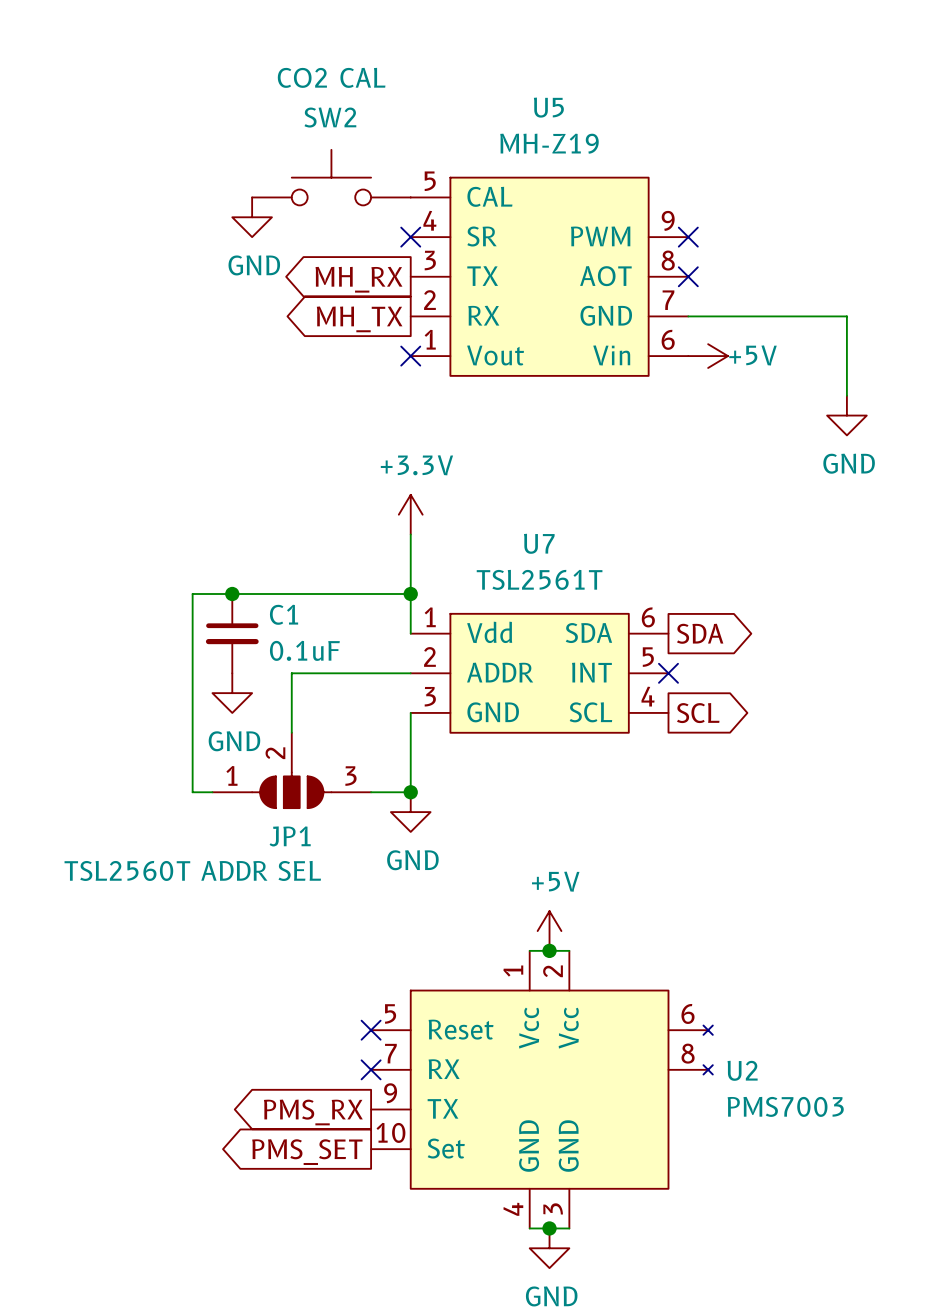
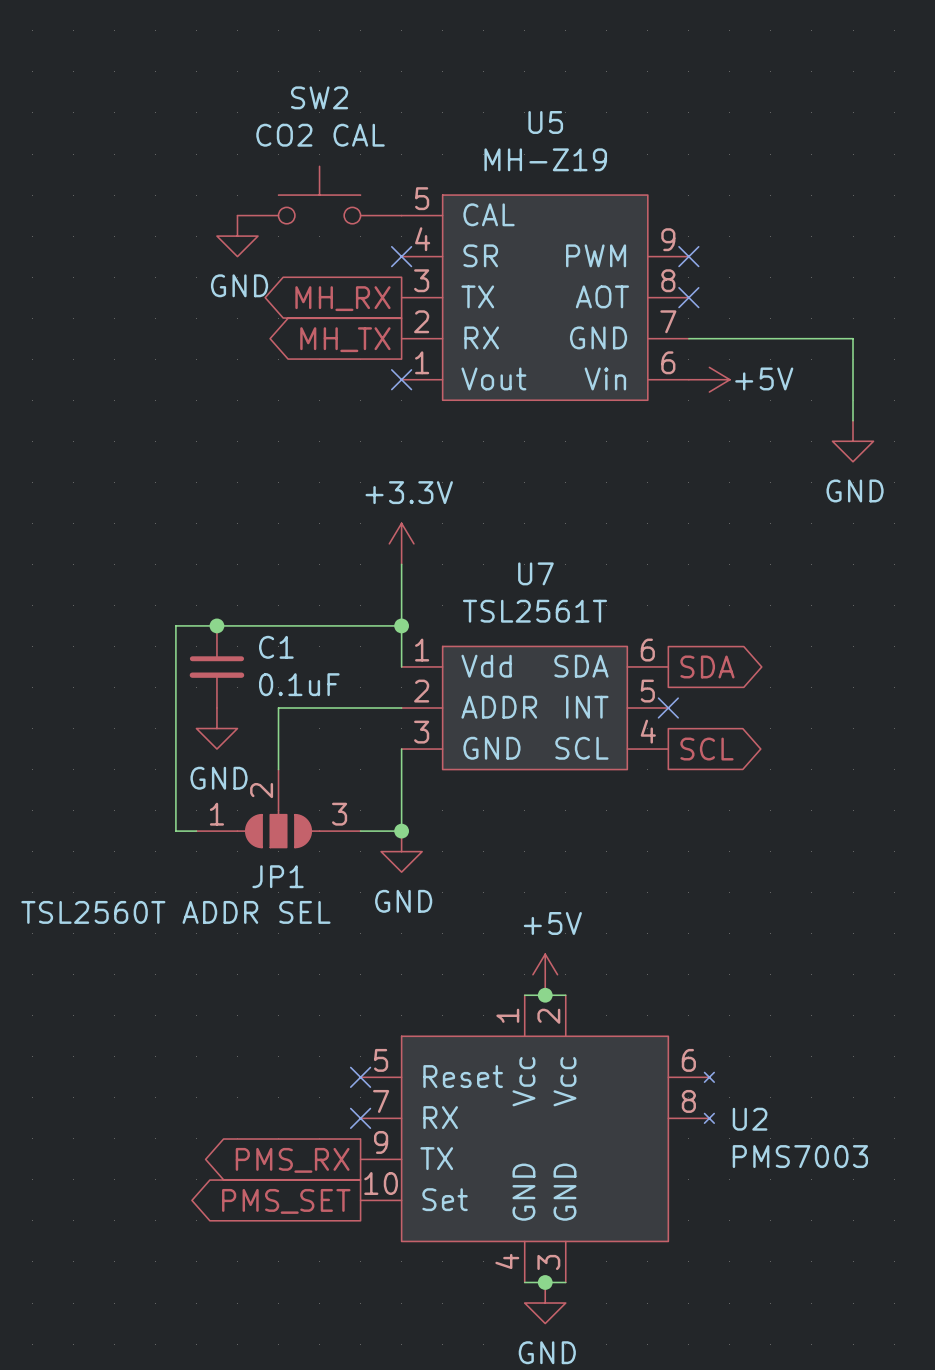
SW2 value position: CO2 CAL (331, 77) -> CO2 CAL (320, 135)
SW2 name position: SW2 (330, 117) -> SW2 (319, 97)

